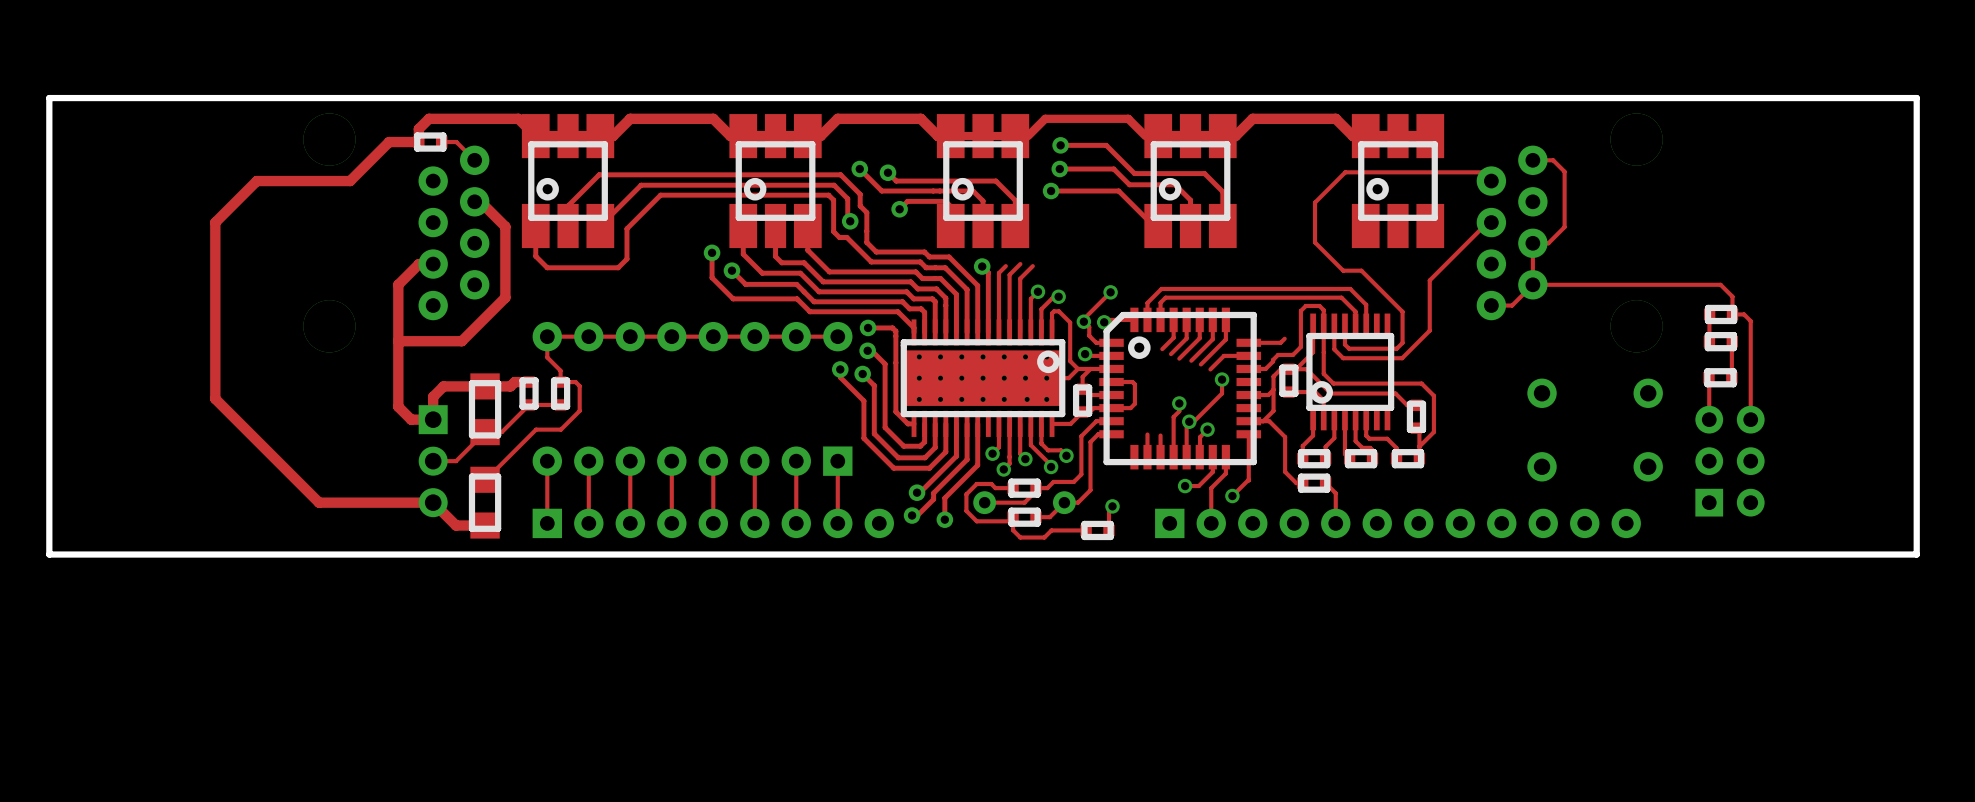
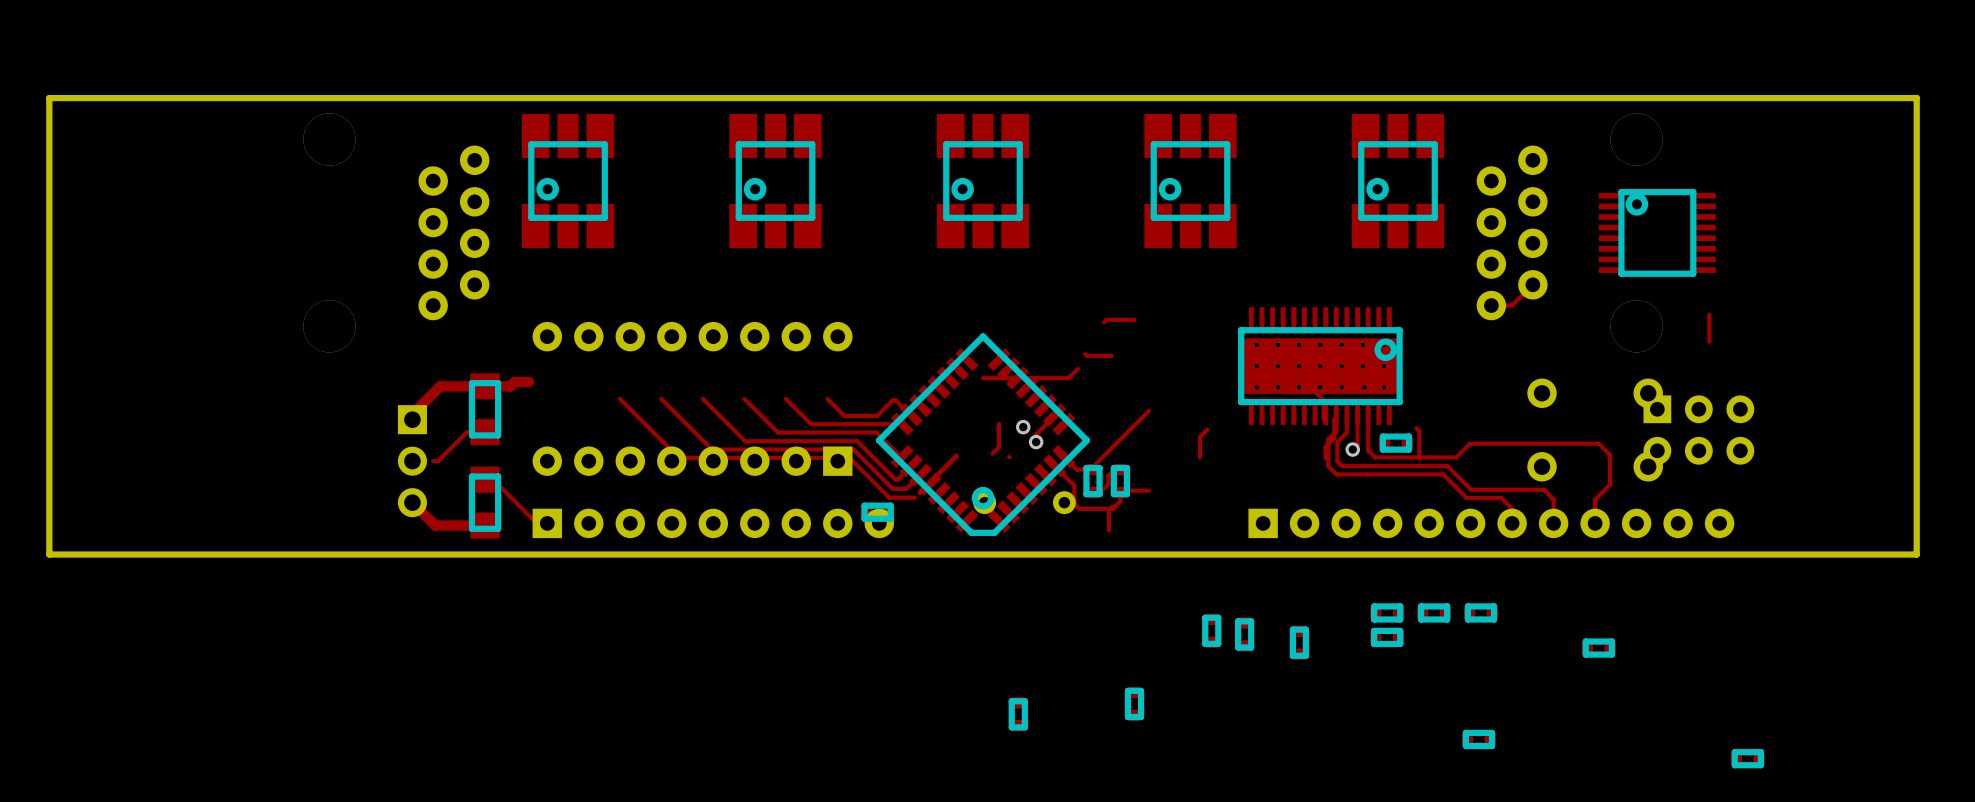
track: (1430, 136) (1353, 136) (1335, 118) (1252, 118) (1235, 136) (1145, 136) (1128, 118) (1045, 118) (1027, 136) (938, 136) (920, 118) (837, 118) (820, 136) (730, 136) (713, 118) (630, 118) (612, 136) (535, 136) (518, 118) (429, 118) (418, 128) (418, 142) (389, 142) (350, 181) (256, 181) (215, 222) (215, 398) (319, 502) (433, 502) (456, 525) -> (412, 502) (435, 525) (456, 525)
part: (430, 142) -> none
track: (441, 142) (456, 142) (474, 160) -> none
track: (1060, 145) (1106, 145) (1134, 173) (1204, 173) (1222, 191) (1222, 225) -> none
via: (1060, 145) -> none
track: (1532, 160) (1553, 160) (1564, 171) (1564, 227) (1548, 243) (1532, 243) (1532, 284) (1720, 284) (1732, 296) (1732, 314) (1744, 314) (1750, 321) (1750, 419) -> none
track: (859, 169) (881, 191) (973, 191) (983, 200) (983, 225) -> none
via: (859, 169) -> none
track: (1059, 169) (1113, 169) (1129, 184) (1175, 184) (1190, 200) (1190, 225) -> none
via: (1059, 169) -> none
track: (888, 172) (896, 181) (995, 181) (1015, 200) (1015, 225) -> none
via: (888, 172) -> none
track: (1491, 181) (1482, 172) (1345, 172) (1315, 202) (1315, 242) (1343, 270) (1361, 270) (1402, 311) (1402, 342) (1396, 348) (1349, 348) (1344, 344) (1344, 324) -> none
track: (1051, 191) (1118, 191) (1153, 225) (1158, 225) -> none
via: (1051, 191) -> none
track: (474, 201) (480, 201) (505, 226) (505, 297) (461, 341) (398, 341) -> none
track: (899, 209) (907, 201) (945, 201) (950, 206) (950, 225) -> none
via: (899, 209) -> none
track: (850, 221) (847, 218) (847, 198) (834, 185) (641, 185) (600, 225) (605, 225) -> none
via: (850, 221) -> none
track: (1491, 222) (1487, 222) (1429, 280) (1429, 330) (1402, 358) (1343, 358) (1334, 349) (1334, 324) -> none
track: (535, 225) (535, 256) (547, 267) (618, 267) (626, 259) (626, 228) (660, 195) (828, 195) (833, 200) (833, 231) (839, 237) (846, 237) (871, 261) (920, 261) (926, 267) (945, 267) (967, 289) (967, 332) -> none
track: (568, 225) (568, 205) (599, 174) (840, 174) (860, 194) (860, 205) (866, 212) (866, 242) (876, 252) (924, 252) (929, 256) (949, 256) (977, 285) (977, 332) -> none
track: (743, 225) (743, 254) (762, 273) (800, 273) (819, 291) (906, 291) (913, 298) (932, 298) (935, 301) (935, 332) -> none
track: (775, 225) (775, 256) (781, 262) (804, 262) (823, 281) (910, 281) (917, 288) (936, 288) (945, 298) (945, 332) -> none
track: (807, 225) (807, 250) (829, 271) (915, 271) (922, 278) (940, 278) (956, 294) (956, 332) -> none
track: (712, 252) (712, 277) (733, 298) (797, 298) (810, 311) (897, 311) (914, 327) (914, 332) -> none
via: (712, 252) -> none
track: (433, 264) (419, 264) (398, 284) (398, 406) (411, 419) (433, 419) (433, 396) (443, 386) -> (412, 419) (412, 414) (440, 386) (443, 386)
track: (1020, 264) (1009, 274) (1009, 332) -> none
track: (982, 266) (988, 272) (988, 332) -> none
via: (982, 266) -> none
track: (1005, 266) (998, 273) (998, 332) -> none
track: (1032, 266) (1020, 278) (1020, 332) -> none
track: (731, 270) (745, 284) (796, 284) (814, 301) (902, 301) (909, 308) (921, 308) (924, 312) (924, 332) -> none
via: (731, 270) -> none
track: (1037, 291) (1030, 298) (1030, 332) -> none
via: (1037, 291) -> none
track: (1110, 292) (1083, 319) (1083, 321) (1089, 327) (1089, 335) (1096, 342) (1111, 342) -> none
via: (1110, 292) -> none
track: (1058, 296) (1052, 298) (1041, 309) (1041, 332) -> none
via: (1058, 296) -> none
part: (1721, 314) -> none
track: (1147, 319) (1147, 302) (1161, 288) (1350, 288) (1366, 304) (1366, 324) -> none
track: (1160, 319) (1160, 302) (1165, 297) (1341, 297) (1355, 311) (1355, 324) -> none
track: (1173, 319) (1173, 337) (1162, 349) -> none
track: (1186, 319) (1186, 338) (1171, 354) -> none
track: (1199, 319) (1199, 338) (1179, 358) -> none
track: (1212, 319) (1212, 339) (1191, 360) -> none
track: (1225, 319) (1225, 339) (1200, 364) -> none
via: (1083, 321) -> none
via: (1104, 322) -> none
track: (1313, 324) (1313, 352) (1296, 369) -> none
track: (868, 327) (892, 327) (895, 331) (895, 411) (908, 423) (914, 423) -> none
via: (868, 327) -> none
track: (1052, 332) (1052, 313) (1058, 311) (1070, 322) (1070, 361) (1077, 368) (1111, 368) -> none
track: (837, 336) (547, 336) (547, 357) (560, 370) (560, 382) (575, 382) (579, 386) (579, 410) (561, 429) (536, 429) (485, 479) -> (536, 523) (493, 479) (485, 479)
track: (1284, 338) (1280, 342) (1248, 342) -> none
part: (1720, 341) -> none
track: (1732, 341) (1731, 377) -> none
track: (867, 350) (871, 350) (885, 364) (885, 427) (903, 446) (920, 446) (924, 441) (924, 423) -> none
via: (867, 350) -> none
via: (1085, 354) -> none
track: (1248, 355) (1224, 355) (1210, 369) -> none
track: (1090, 368) (1082, 376) (1082, 389) (1088, 395) (1111, 395) -> none
track: (1248, 368) (1265, 368) (1278, 354) (1293, 354) (1300, 347) (1300, 310) (1305, 305) (1319, 305) (1323, 310) (1323, 373) (1333, 383) (1421, 383) (1433, 395) (1433, 432) (1419, 446) -> none
track: (840, 369) (840, 377) (863, 400) (863, 438) (893, 468) (929, 468) (945, 451) (945, 423) -> none
via: (840, 369) -> none
part rotation: 0° (1350, 371) -> 90° clockwise (1657, 232)
part position: (1350, 371) -> (1657, 232)
track: (862, 374) (874, 385) (874, 433) (898, 457) (924, 457) (935, 447) (935, 423) -> none
via: (862, 374) -> none
track: (1709, 377) (1709, 419) -> none
part: (1720, 377) -> none
part position: (983, 378) -> (1320, 366)
track: (1222, 379) (1222, 393) (1193, 421) (1189, 421) (1186, 424) (1186, 457) -> none
via: (1222, 379) -> none
part: (1288, 380) -> none
track: (1111, 382) (1132, 382) (1134, 384) (1134, 403) (1130, 408) (1093, 408) (1089, 412) (1082, 412) (1070, 423) (1052, 423) -> none
part: (1180, 388) -> none
track: (1273, 389) (1268, 395) (1248, 395) -> none
part: (529, 393) -> none
part: (560, 393) -> none
track: none -> (619, 398) (678, 457) (849, 457) (889, 497) (914, 497)
track: none -> (661, 398) (712, 449) (853, 449) (892, 488) (906, 488) (920, 475)
track: none -> (702, 398) (745, 441) (857, 441) (895, 479) (911, 465)
track: none -> (744, 398) (778, 432) (876, 432) (902, 456)
track: none -> (785, 398) (811, 424) (902, 424)
track: none -> (827, 398) (844, 415) (877, 415) (892, 400) (895, 400) (911, 414)
part: (1082, 400) -> none
via: (1179, 403) -> none
track: (560, 404) (529, 404) (501, 432) (485, 432) (456, 461) (438, 461) -> (474, 432) (467, 432) (438, 461)
track: (1178, 404) (1179, 411) (1173, 417) (1173, 457) -> none
track: (1416, 405) (1407, 405) (1395, 393) (1330, 393) (1306, 369) (1280, 369) (1273, 376) (1273, 410) (1263, 421) -> none
track: none -> (1149, 410) (1093, 466) (1093, 469) (1076, 469) (1063, 456)
track: none -> (1336, 411) (1336, 431) (1328, 439) (1328, 466) (1336, 474) (1443, 474) (1466, 498) (1501, 498) (1512, 508) (1512, 523)
track: none -> (1346, 411) (1346, 432) (1337, 442) (1337, 461) (1342, 466) (1447, 466) (1471, 489) (1544, 489) (1553, 499) (1553, 523)
track: none -> (1357, 411) (1357, 444) (1352, 449)
track: none -> (1368, 411) (1368, 450) (1375, 457) (1456, 457) (1470, 443) (1598, 443) (1610, 454) (1610, 484) (1595, 499) (1595, 523)
track: none -> (1054, 414) (1036, 434) (1036, 442)
part: (1416, 416) -> none
track: (1313, 418) (1313, 435) (1302, 446) (1302, 458) -> none
track: (1344, 418) (1344, 454) (1349, 458) -> none
track: (1355, 418) (1355, 441) (1362, 447) (1370, 447) (1372, 450) (1372, 458) -> none
track: (1366, 418) (1366, 435) (1369, 438) (1387, 438) (1396, 448) (1396, 458) -> none
track: (1111, 421) (1096, 421) (1081, 436) (1081, 474) (1073, 481) (1053, 481) (1047, 488) (1035, 488) (1035, 491) (1024, 502) (984, 502) -> none
via: (1189, 421) -> none
track: (1248, 421) (1269, 421) (1285, 437) (1285, 471) (1296, 483) (1302, 483) -> none
track: (956, 423) (956, 456) -> none
track: (967, 423) (967, 459) (933, 493) (933, 499) (917, 515) (912, 515) -> none
track: (977, 423) (977, 465) (944, 498) (944, 519) -> none
track: (1009, 423) (1009, 463) (1003, 469) -> none
track: (1020, 423) (1020, 453) (1025, 459) -> none
track: (1030, 423) (1030, 445) (1051, 466) -> none
track: (1041, 423) (1041, 443) (1048, 450) (1061, 450) (1066, 455) -> none
via: none -> (1023, 427)
via: (1207, 429) -> none
part: none -> (983, 434)
track: (1111, 434) (1098, 434) (1090, 442) (1090, 490) (1078, 502) (1064, 502) (1049, 517) (1035, 517) -> none
track: (1147, 434) (1147, 457) -> none
track: (1248, 434) (1248, 480) -> none
track: (1160, 435) (1160, 457) -> none
via: none -> (1036, 442)
part: none -> (1395, 443)
via: none -> (1352, 449)
via: (992, 453) -> none
via: (1066, 455) -> none
track: (1212, 457) (1212, 472) (1198, 486) (1185, 486) -> none
track: (1225, 457) (1225, 473) (1211, 488) (1211, 523) -> none
part: (1314, 458) -> none
part: (1361, 458) -> none
part: (1407, 458) -> none
via: (1025, 459) -> none
part position: (433, 461) -> (412, 461)
track: (547, 461) (547, 523) -> none
track: (588, 461) (588, 523) -> none
track: (630, 461) (630, 523) -> none
track: (671, 461) (671, 523) -> none
track: (713, 461) (713, 523) -> none
track: (754, 461) (754, 523) -> none
track: (796, 461) (796, 523) -> none
track: (837, 461) (837, 523) -> none
part rotation: 0° (1729, 461) -> 90° clockwise (1698, 430)
track: none -> (1054, 465) (1074, 485) (1074, 503) (1079, 508) (1112, 508) (1120, 501) (1120, 492) (1122, 490) (1149, 490)
via: (1051, 466) -> none
via: (1003, 469) -> none
track: none -> (1120, 469) (1114, 469) (1108, 475) (1108, 484) (1100, 492) (1093, 492)
track: (1248, 480) (1232, 496) -> none
part: none -> (1093, 481)
part: none -> (1120, 481)
part: (1314, 483) -> none
track: (1325, 483) (1335, 493) (1335, 523) -> none
via: (1185, 486) -> none
track: (1013, 488) (995, 488) (991, 483) (976, 483) (966, 494) (966, 510) (976, 521) (1008, 521) (1013, 517) (1013, 530) (1020, 537) (1044, 537) (1051, 530) (1086, 530) -> none
part: (1024, 488) -> none
via: (917, 492) -> none
via: (1232, 496) -> none
via: (1112, 506) -> none
part: none -> (877, 512)
via: (912, 515) -> none
part: (1024, 517) -> none
via: (944, 519) -> none
part position: (1398, 523) -> (1491, 523)
part: (1097, 530) -> none
part: none -> (1387, 612)
part: none -> (1434, 612)
part: none -> (1481, 612)
part: none -> (1211, 630)
part: none -> (1244, 634)
part: none -> (1387, 637)
part: none -> (1299, 642)
part: none -> (1598, 648)
part: none -> (1134, 703)
part: none -> (1018, 714)
part: none -> (1478, 739)
part: none -> (1747, 758)

